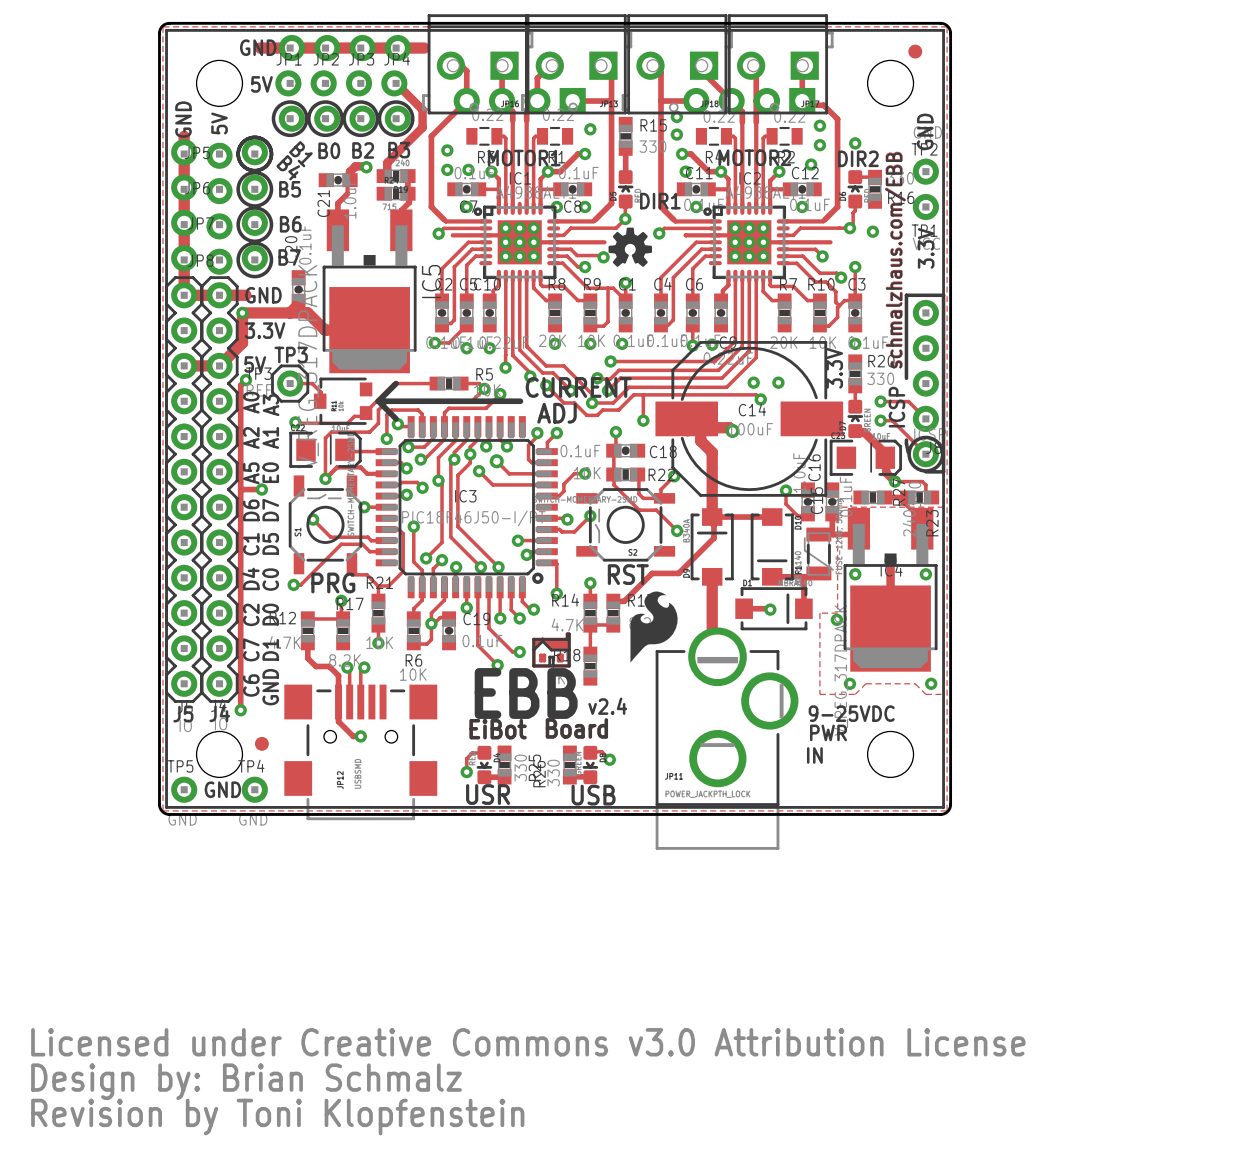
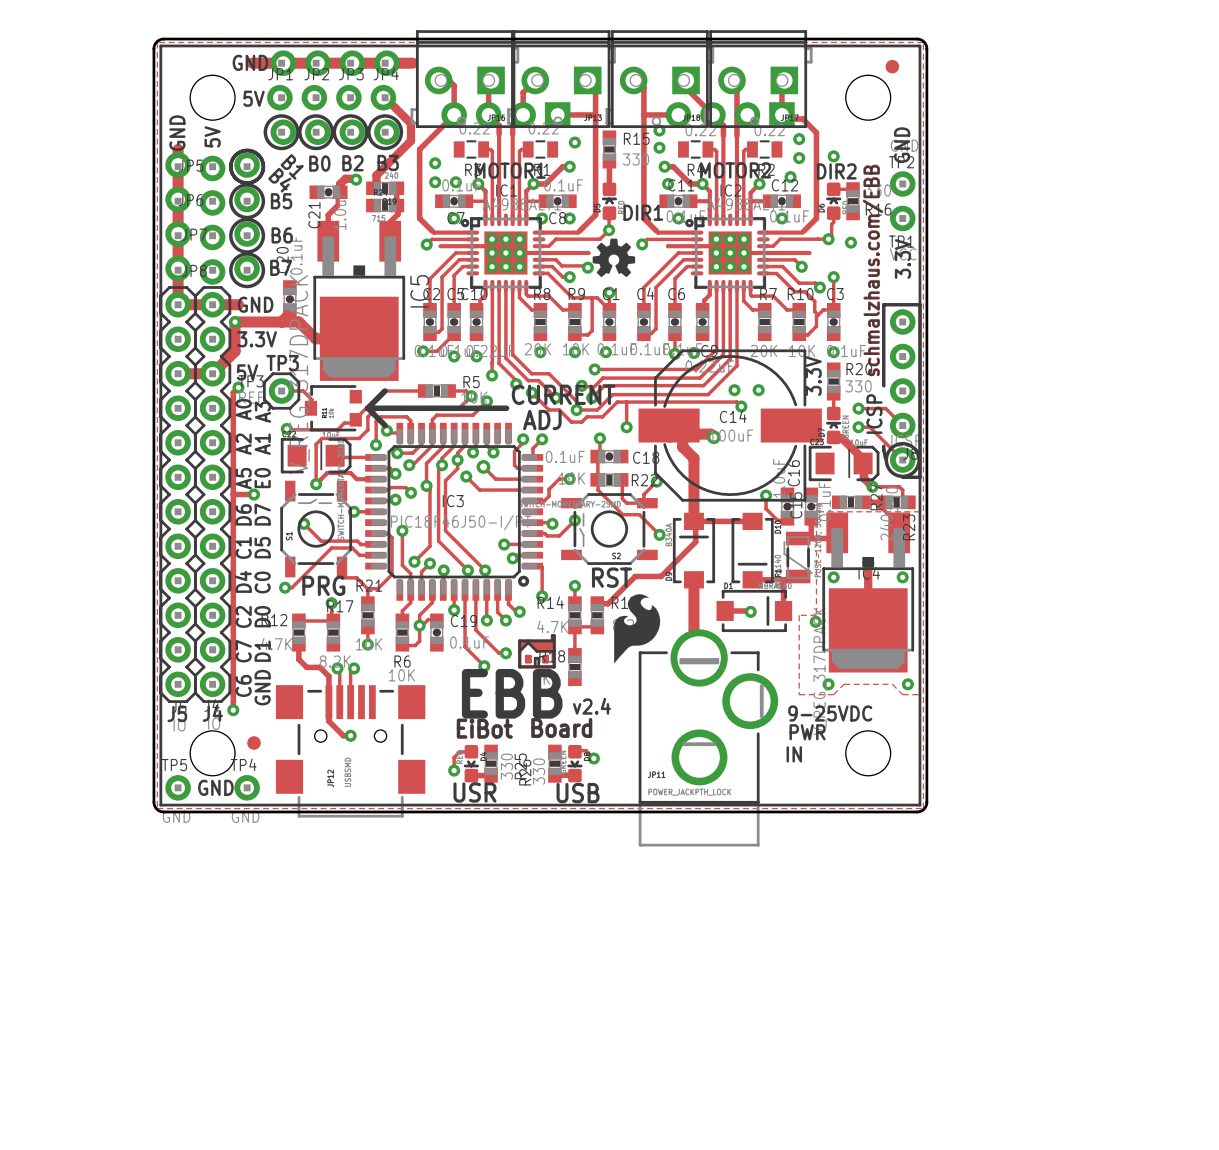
text: Licensed under Creative Commons v3.0 Attribution License (528, 1042) -> none
text: Design by: Brian Schmalz (246, 1081) -> none
text: Revision by Toni Klopfenstein (277, 1117) -> none

